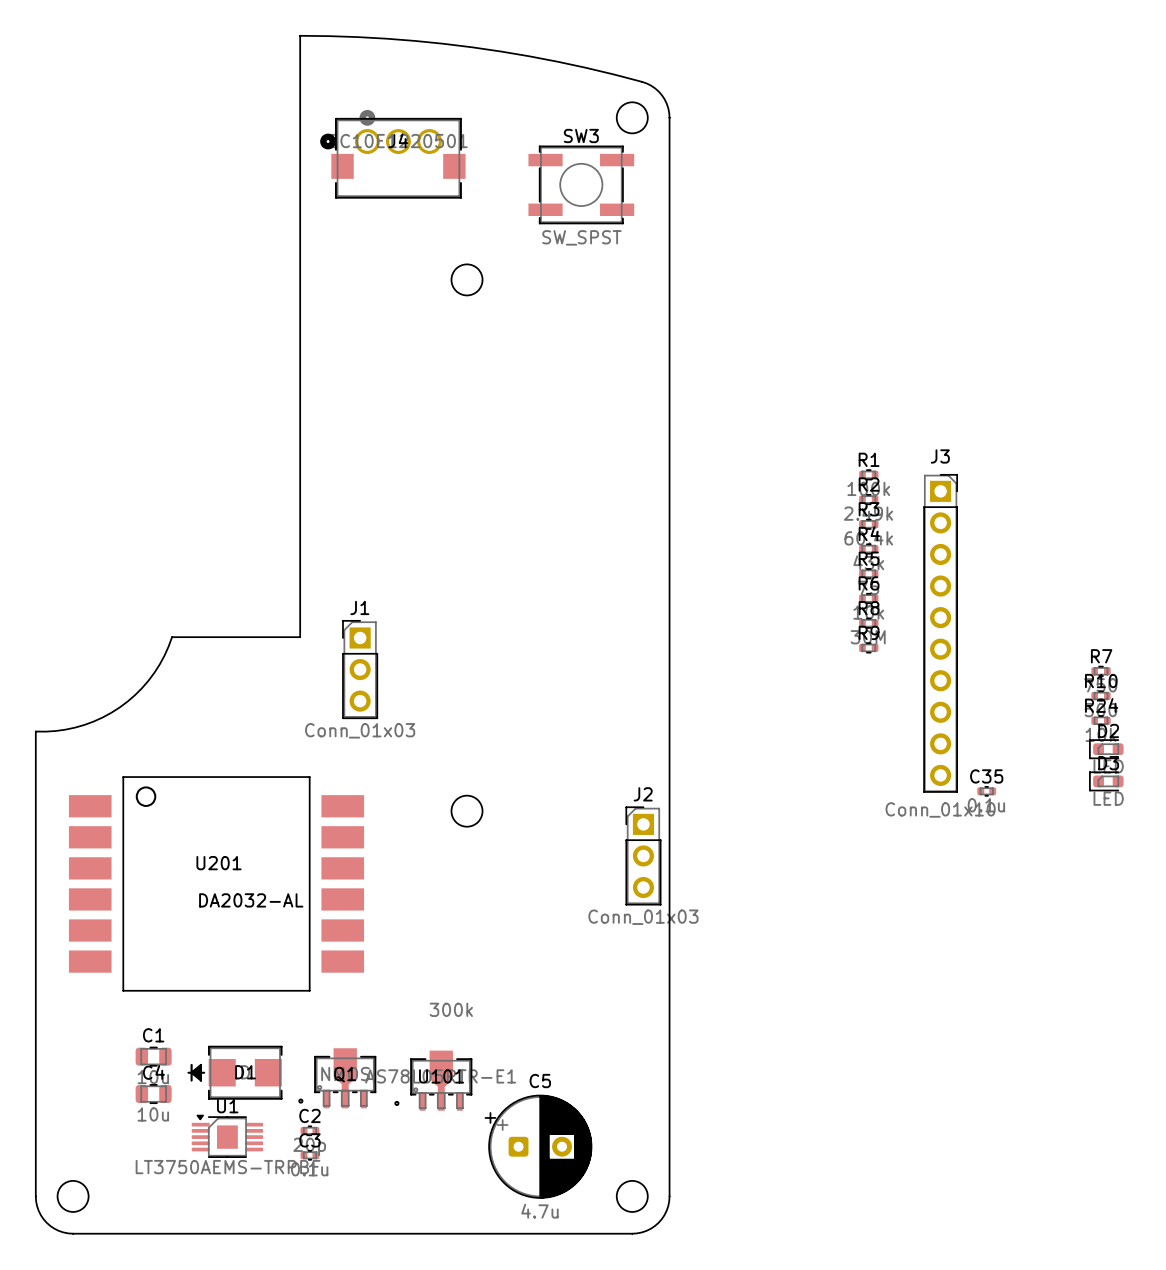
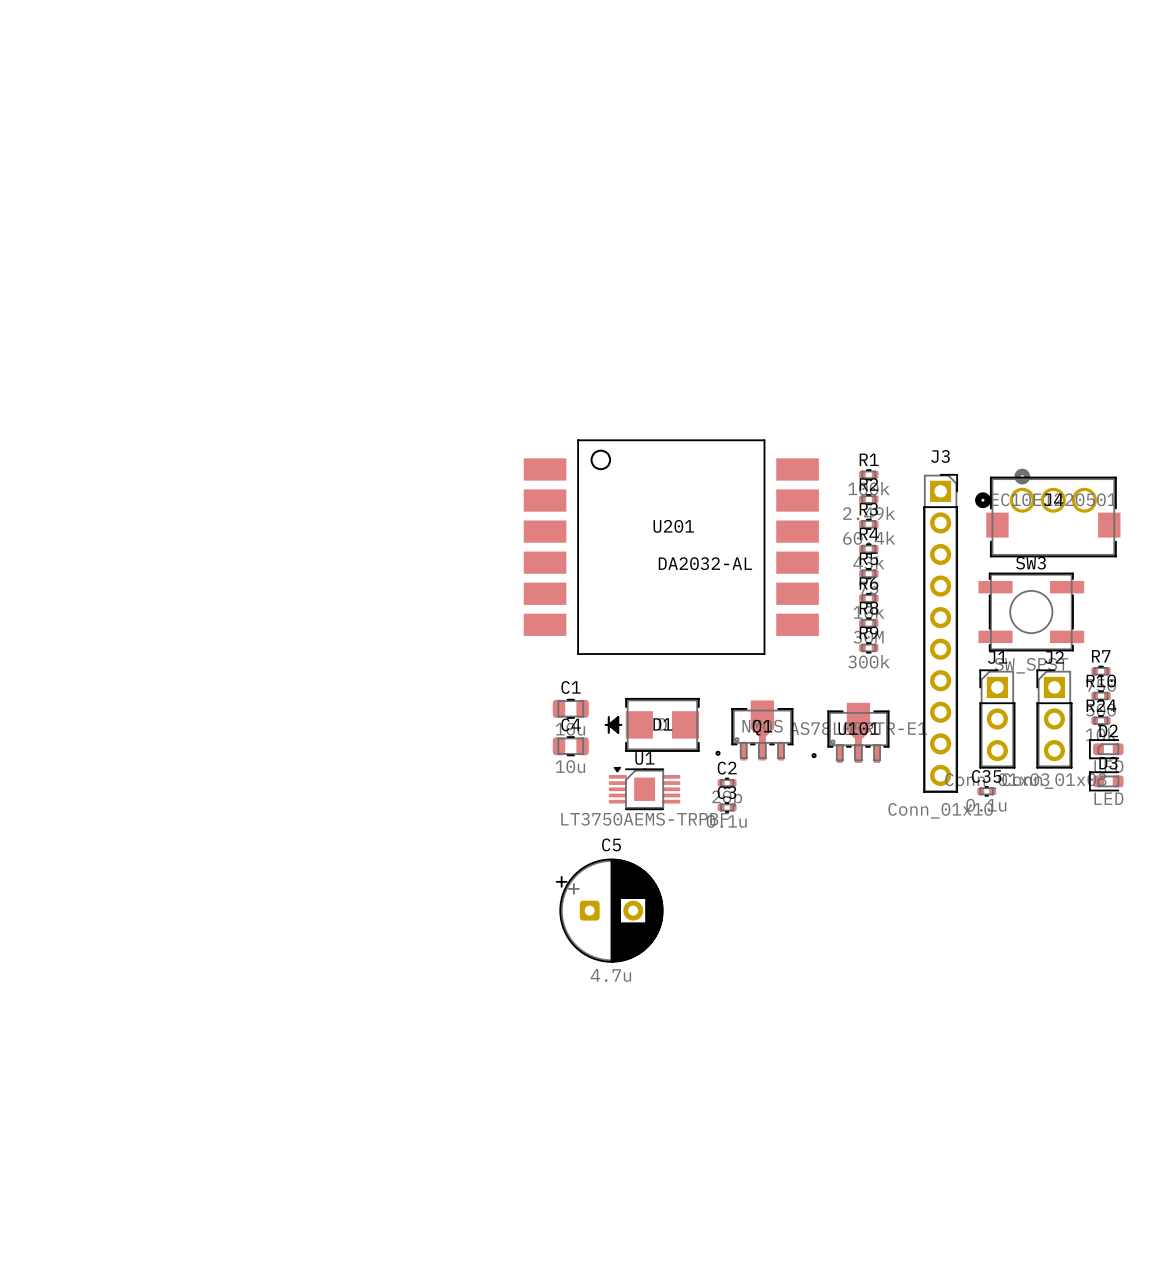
board edge: (300, 35) (300, 637) (172, 637) (154, 672) (135, 694) (119, 707) (84, 724) (65, 729) (35, 731) (37, 1206) (43, 1219) (50, 1226) (63, 1232) (73, 1233) (641, 1232) (654, 1226) (661, 1219) (668, 1206) (669, 1196) (668, 108) (661, 95) (646, 83) (557, 61) (501, 51) (415, 40) (300, 35) -> none
round board edge: [616, 101, 649, 134] -> none
J4 position: (392, 154) -> (1047, 513)
SW3 position: (581, 184) -> (1031, 612)
round board edge: [450, 263, 484, 297] -> none
J1 position: (360, 669) -> (997, 719)
round board edge: [450, 795, 484, 828] -> none
J2 position: (643, 855) -> (1054, 719)
U201 position: (216, 883) -> (671, 547)
R9 value position: 300k (451, 1009) -> 300k (868, 661)
C1 position: (153, 1056) -> (570, 708)
D1 position: (235, 1072) -> (652, 724)
Q1 position: (337, 1078) -> (754, 730)
U101 position: (433, 1080) -> (850, 732)
C4 position: (153, 1094) -> (570, 746)
C2 position: (309, 1130) -> (727, 783)
U1 position: (227, 1136) -> (644, 788)
C5 position: (538, 1146) -> (609, 910)
C3 position: (309, 1155) -> (727, 807)
round board edge: [56, 1180, 90, 1213] -> none
round board edge: [616, 1180, 649, 1213] -> none

